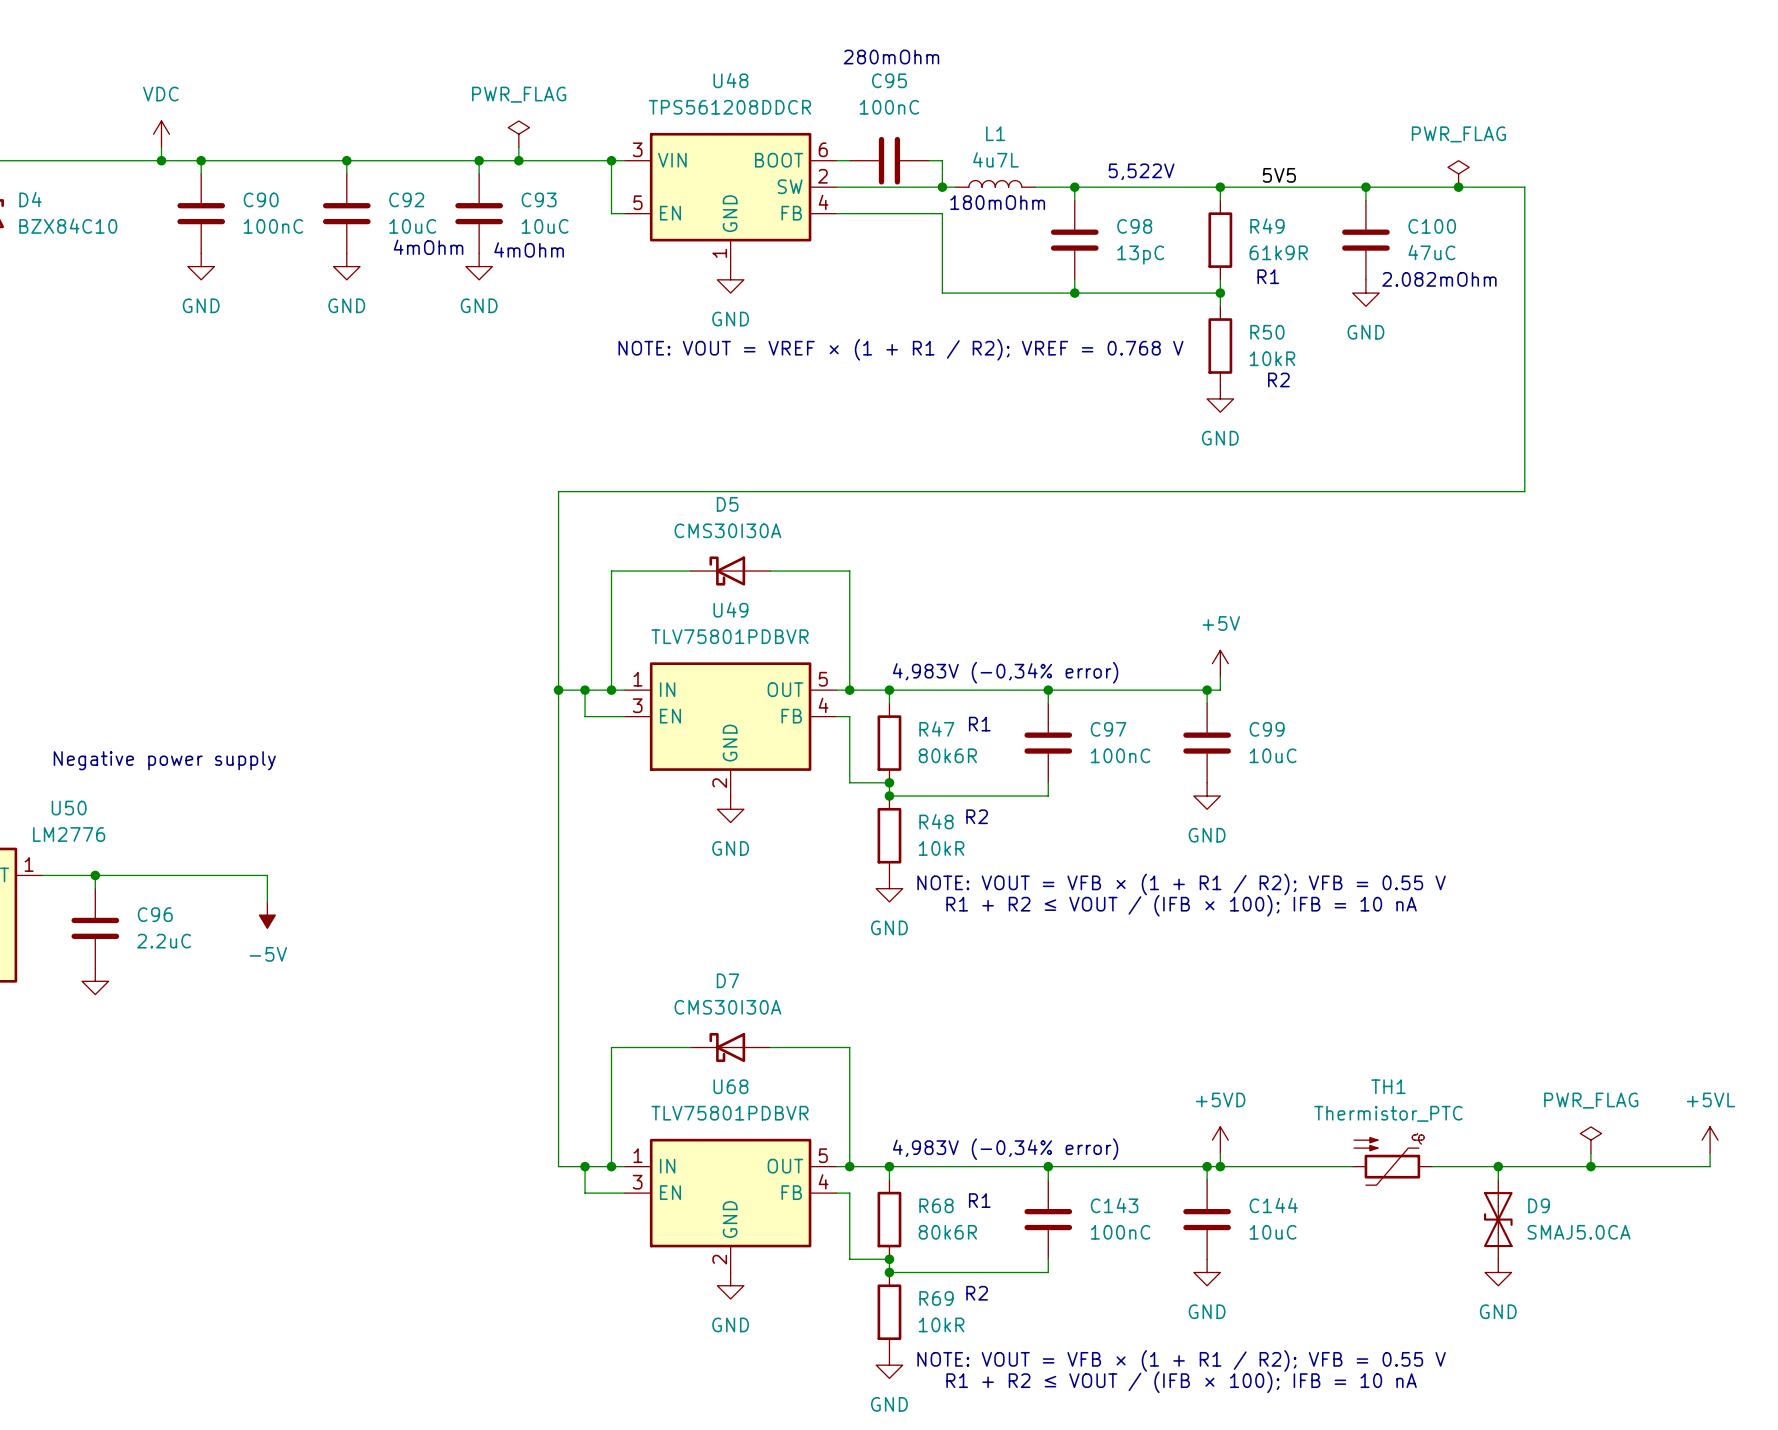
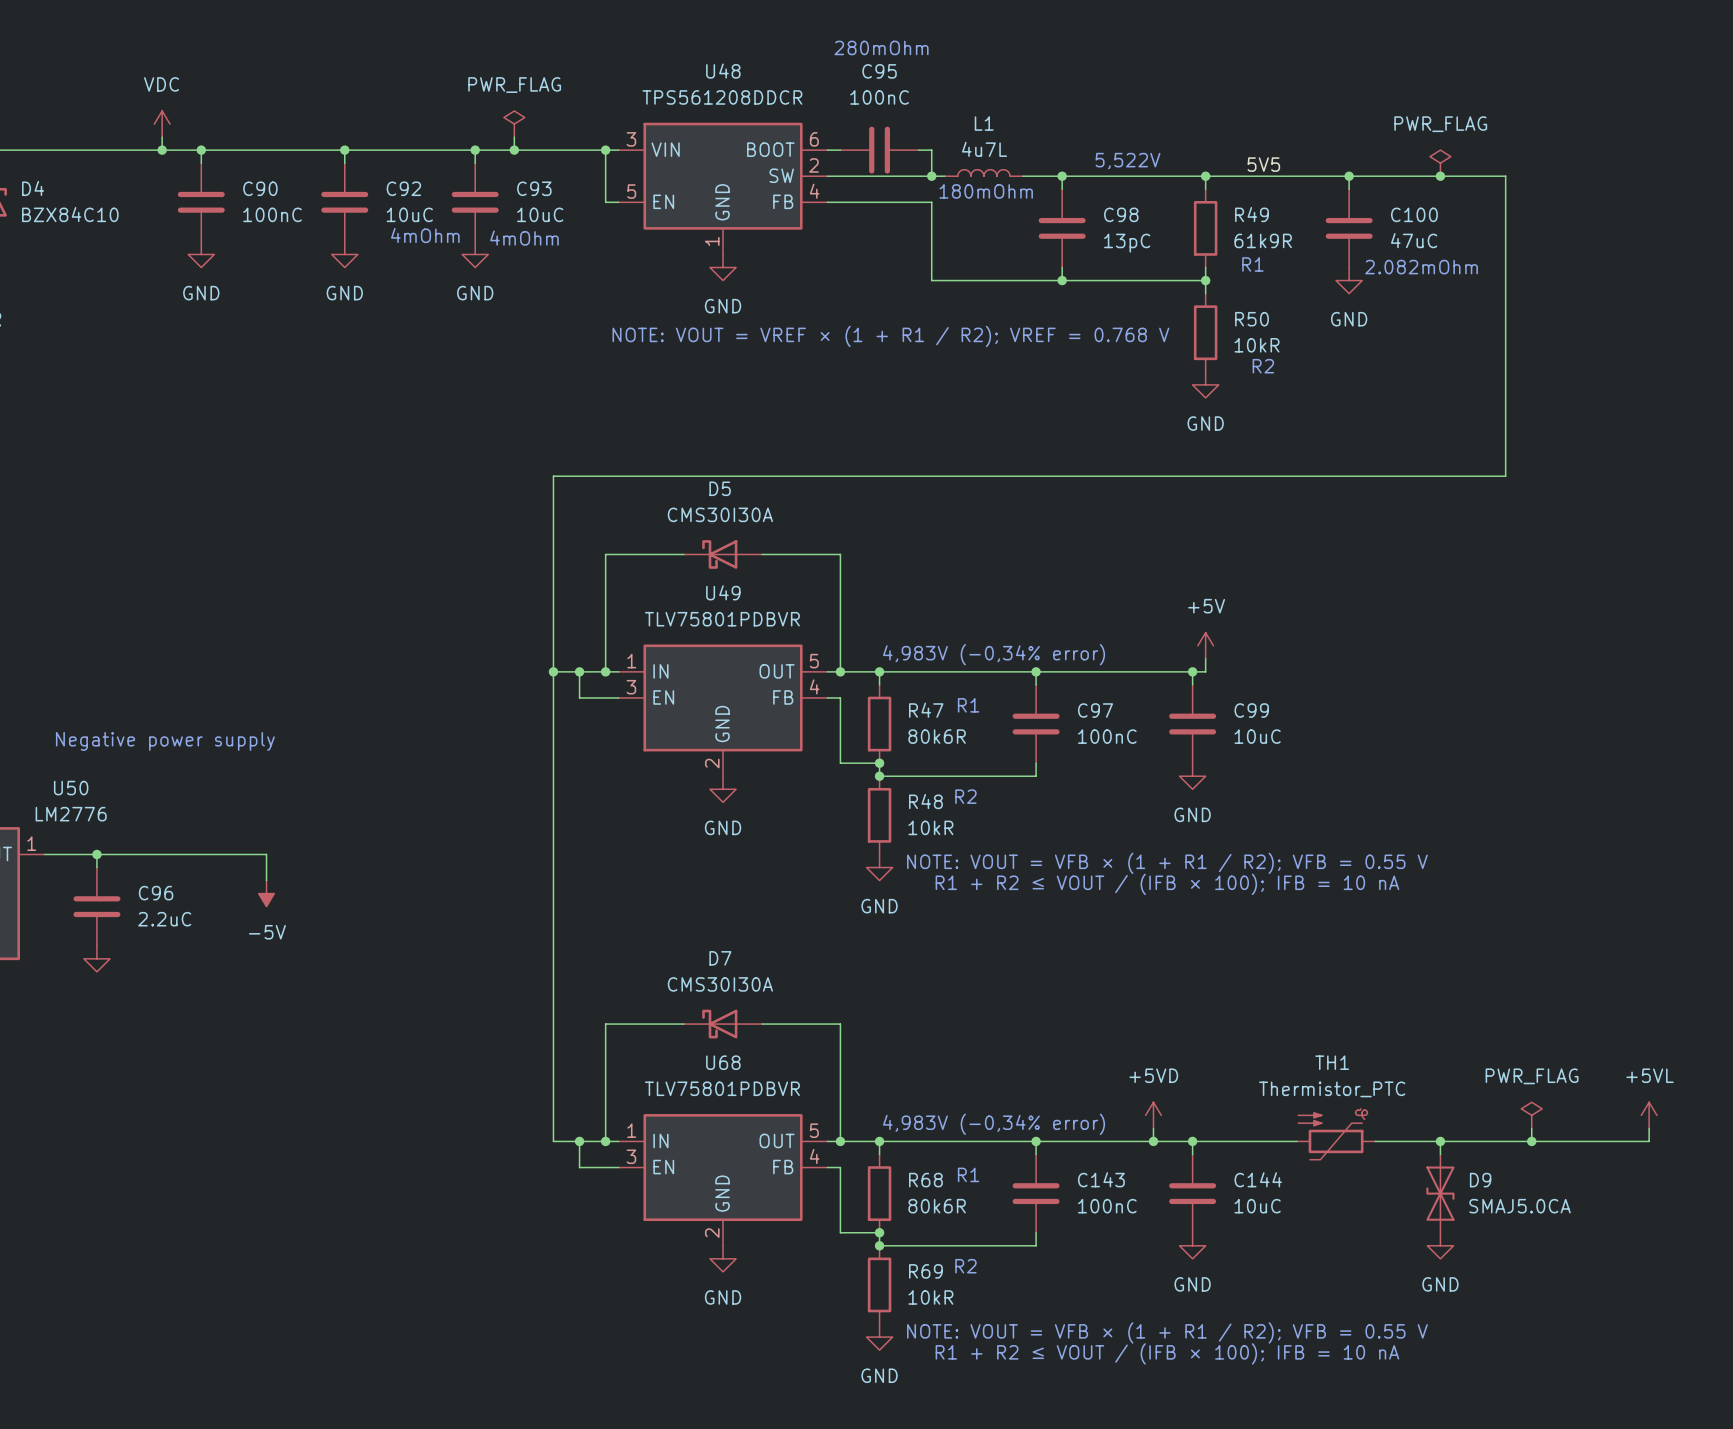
power symbol position: +5VD (1220, 1140) -> +5VD (1153, 1115)
power symbol position: PWR_FLAG (1590, 1140) -> PWR_FLAG (1531, 1115)
power symbol position: +5VL (1710, 1140) -> +5VL (1649, 1115)
wire: (1220, 1153) (1220, 1166) -> (1153, 1128) (1153, 1141)
wire: (1590, 1153) (1590, 1166) -> (1531, 1128) (1531, 1141)
wire: (1710, 1153) (1710, 1166) (1670, 1166) -> (1649, 1128) (1649, 1141)
TH1 position: (1392, 1159) -> (1336, 1134)
junction position: (1220, 1166) -> (1153, 1141)
wire: (1312, 1166) (1352, 1166) -> (1375, 1141) (1414, 1141)
junction: none -> (1440, 1141)
wire: (1498, 1166) (1498, 1179) -> (1440, 1141) (1440, 1154)
junction: (1498, 1166) -> none
junction: none -> (1531, 1141)
junction: (1590, 1166) -> none
D9 position: (1498, 1219) -> (1440, 1193)
power symbol position: GND (1498, 1272) -> GND (1440, 1245)

